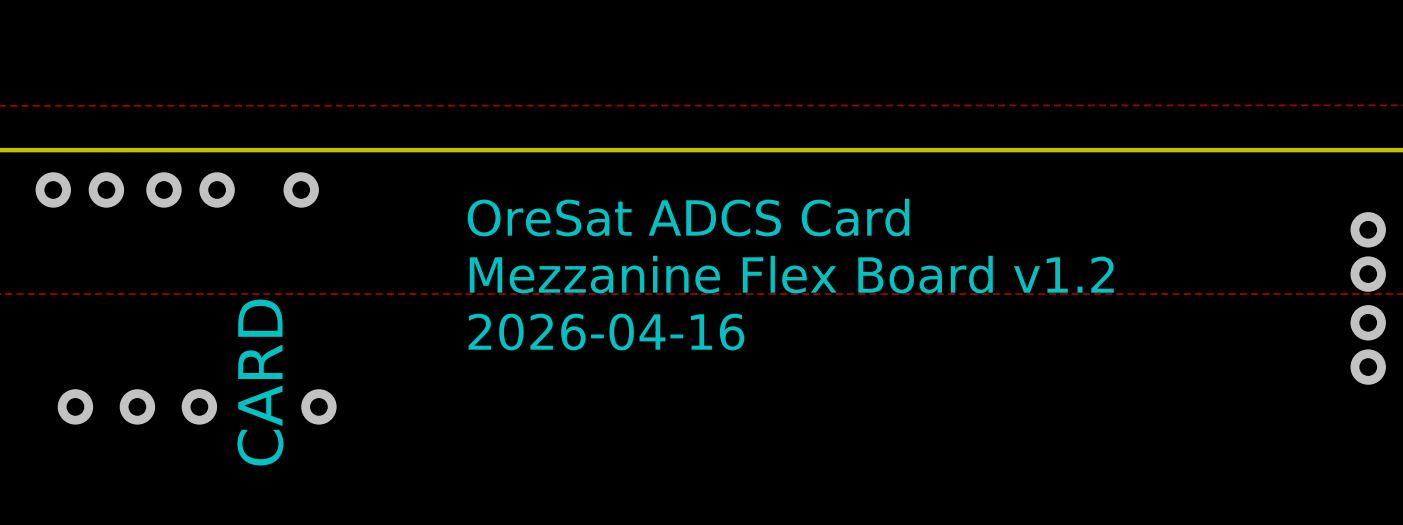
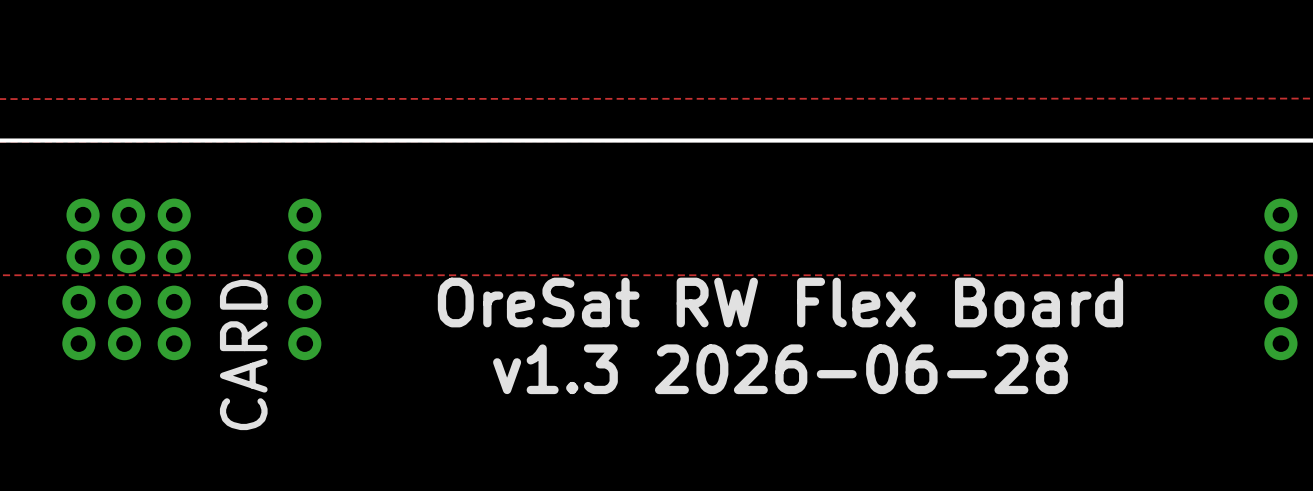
via: (53, 189) -> none
via: (106, 189) -> none
via: (163, 189) -> none
via: (217, 189) -> none
via: (301, 189) -> none
text: OreSat ADCS Card (688, 217) -> none
via: none -> (83, 215)
via: none -> (128, 215)
via: none -> (174, 215)
via: none -> (304, 215)
via: none -> (83, 256)
via: none -> (128, 256)
via: none -> (174, 256)
via: none -> (304, 256)
text: Mezzanine Flex Board v1.2 (791, 274) -> none
via: none -> (78, 302)
via: none -> (124, 302)
via: none -> (174, 302)
via: none -> (304, 302)
text: none -> OreSat RW Flex Board (780, 302)
text: 2026-04-16 (606, 332) -> none
via: none -> (78, 343)
via: none -> (124, 343)
via: none -> (174, 343)
text: none -> v1.3 2026-06-28 (780, 369)
via: (75, 406) -> none
via: (137, 406) -> none
via: (199, 406) -> none
via position: (318, 406) -> (304, 343)

